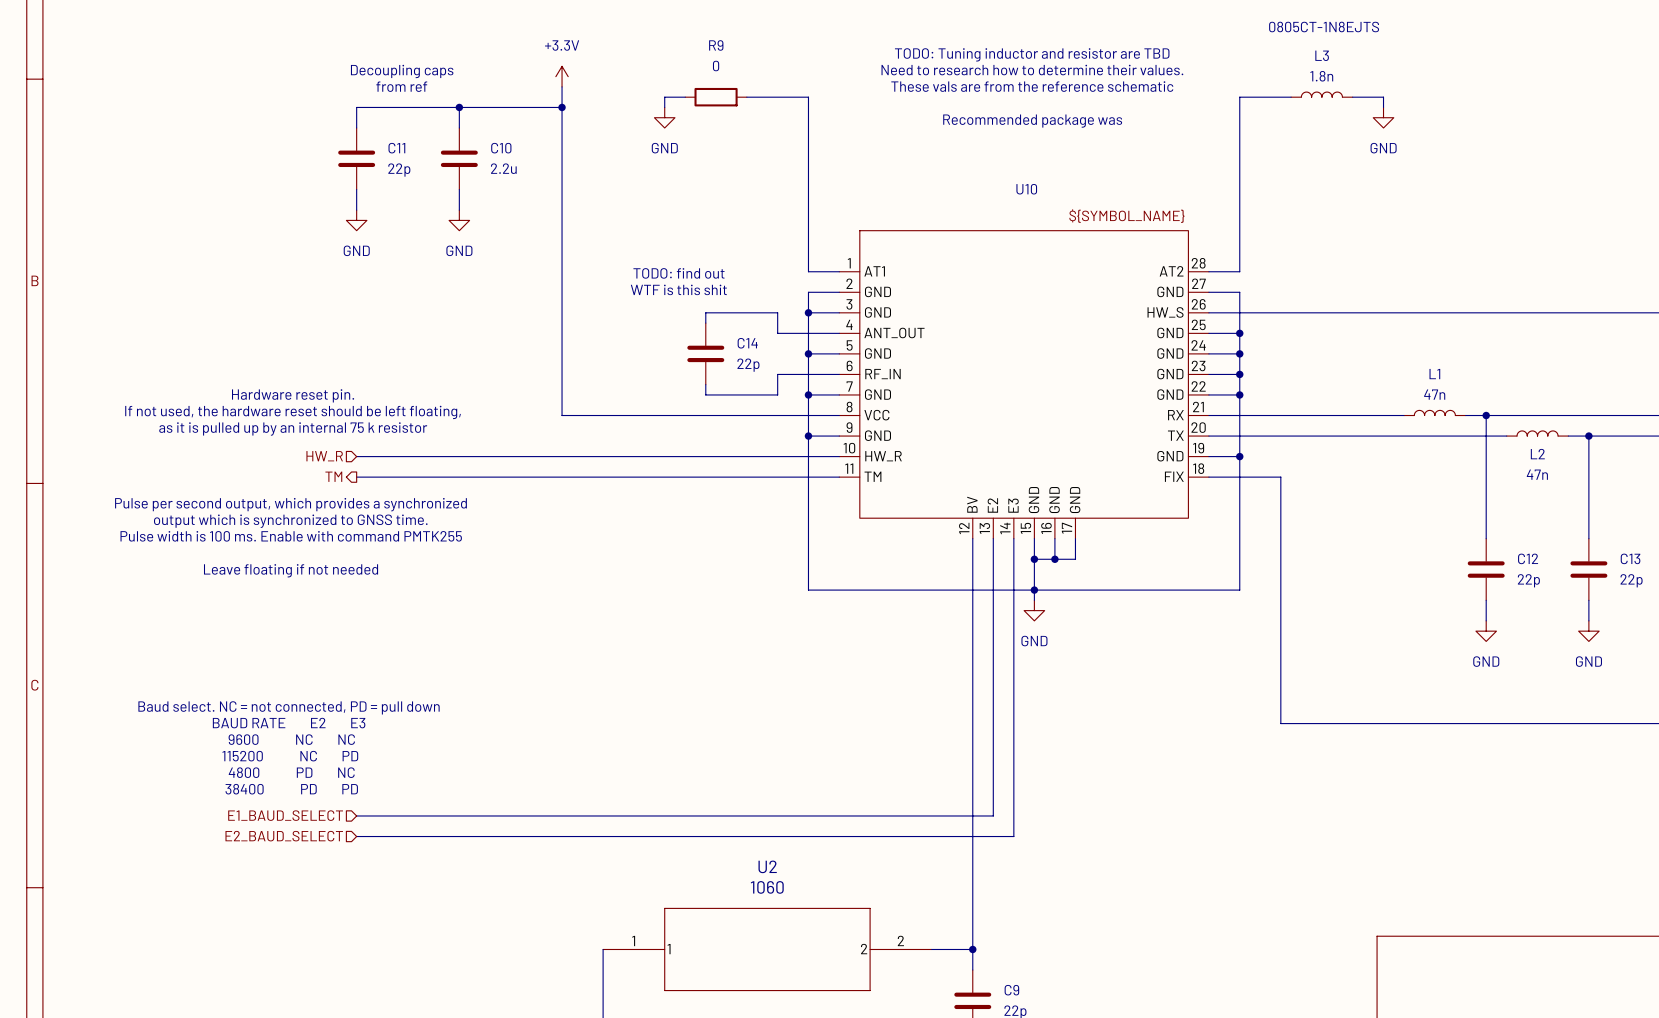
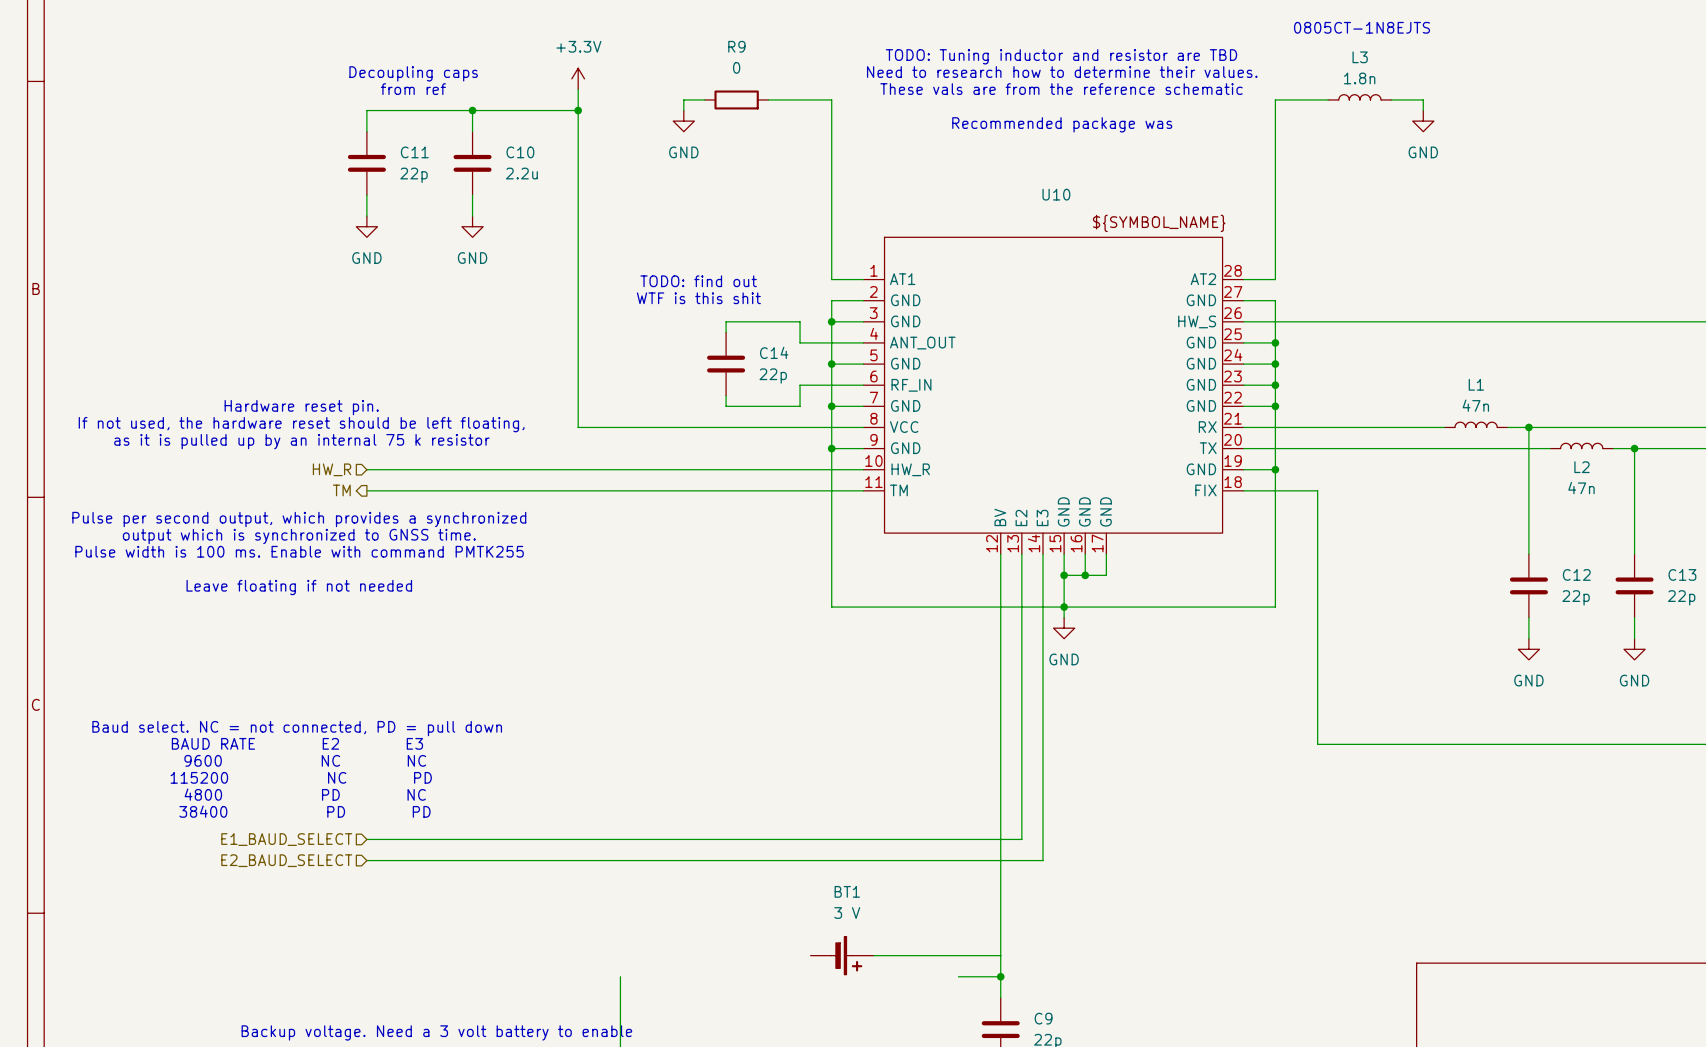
BT1: none -> 3 V (842, 955)
wire: none -> (873, 955) (1000, 955)
U2: 1060 (767, 949) -> none
text: none -> Backup voltage. Need a 3 volt battery to enable (436, 1032)

